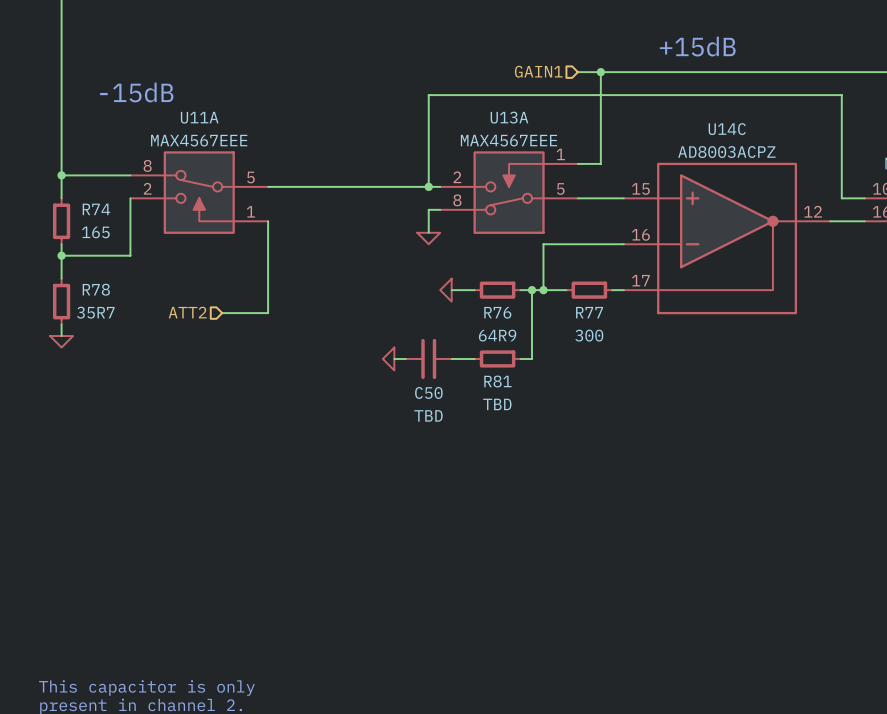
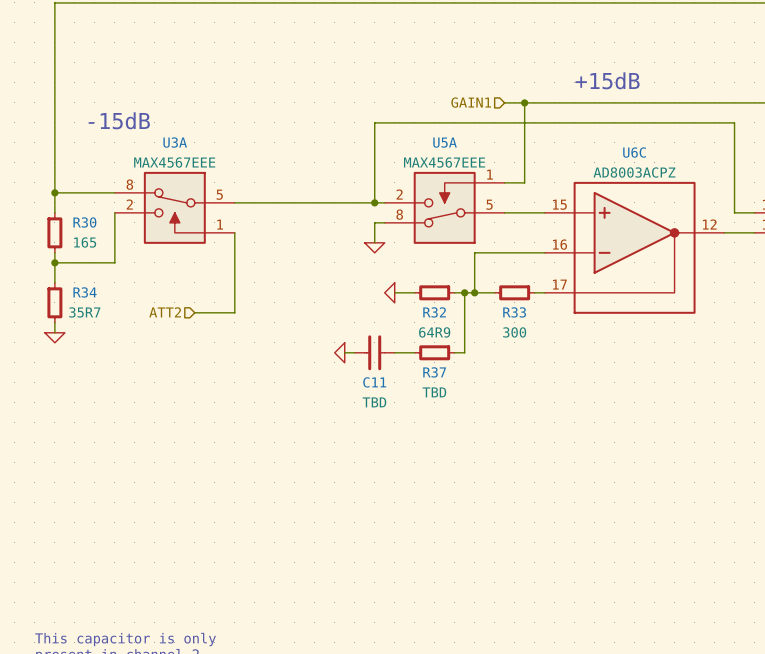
U11A name: U11A (199, 117) -> U3A (175, 142)
U13A name: U13A (509, 117) -> U5A (445, 142)
U14C name: U14C (727, 129) -> U6C (634, 152)
R74 name: R74 (96, 209) -> R30 (84, 222)
R78 name: R78 (96, 289) -> R34 (85, 292)
R76 name: R76 (497, 312) -> R32 (434, 312)
R77 name: R77 (589, 312) -> R33 (514, 312)
R81 name: R81 (497, 381) -> R37 (434, 372)
C50 name: C50 (428, 392) -> C11 (374, 382)

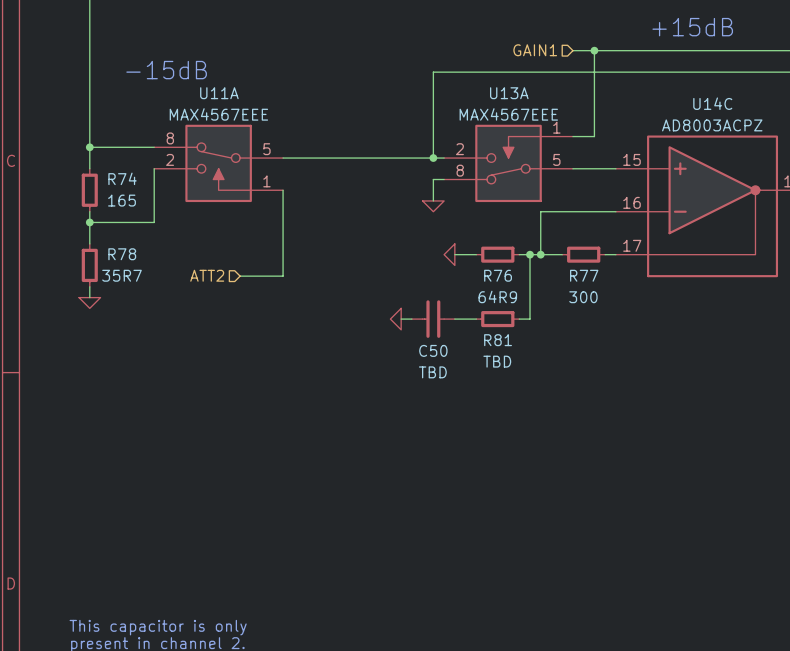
U3A name: U3A (175, 142) -> U11A (219, 93)
U5A name: U5A (445, 142) -> U13A (509, 93)
U6C name: U6C (634, 152) -> U14C (712, 103)
R30 name: R30 (84, 222) -> R74 (122, 178)
R34 name: R34 (85, 292) -> R78 (122, 254)
R32 name: R32 (434, 312) -> R76 (498, 275)
R33 name: R33 (514, 312) -> R77 (584, 275)
R37 name: R37 (434, 372) -> R81 (498, 340)
C11 name: C11 (374, 382) -> C50 (433, 350)

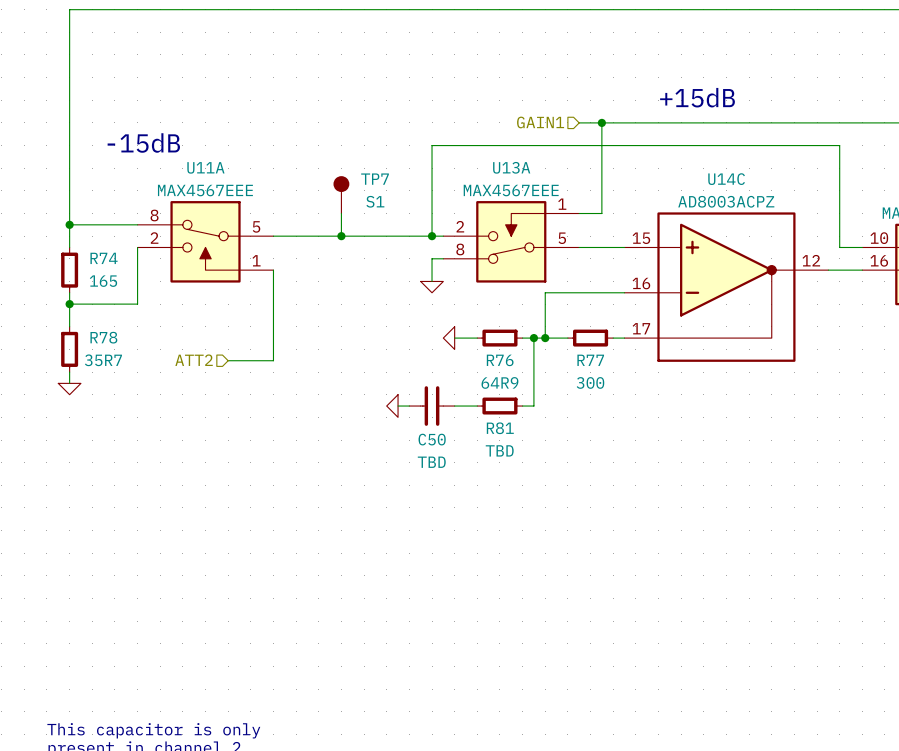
TP7: none -> S1 (341, 194)
wire: none -> (341, 213) (341, 236)
junction: none -> (341, 236)

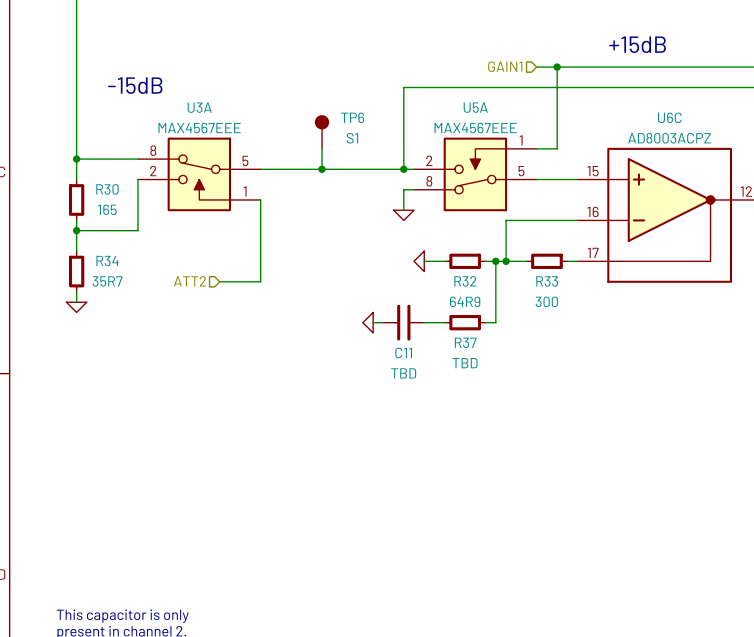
U11A name: U11A (205, 167) -> U3A (199, 107)
U13A name: U13A (511, 167) -> U5A (475, 107)
TP7 name: TP7 (375, 179) -> TP6 (352, 117)
U14C name: U14C (726, 179) -> U6C (669, 117)
R74 name: R74 (104, 258) -> R30 (107, 189)
R78 name: R78 (103, 337) -> R34 (107, 261)
R76 name: R76 (500, 360) -> R32 (465, 281)
R77 name: R77 (590, 360) -> R33 (547, 281)
R81 name: R81 (500, 428) -> R37 (465, 342)
C50 name: C50 (432, 439) -> C11 (403, 352)

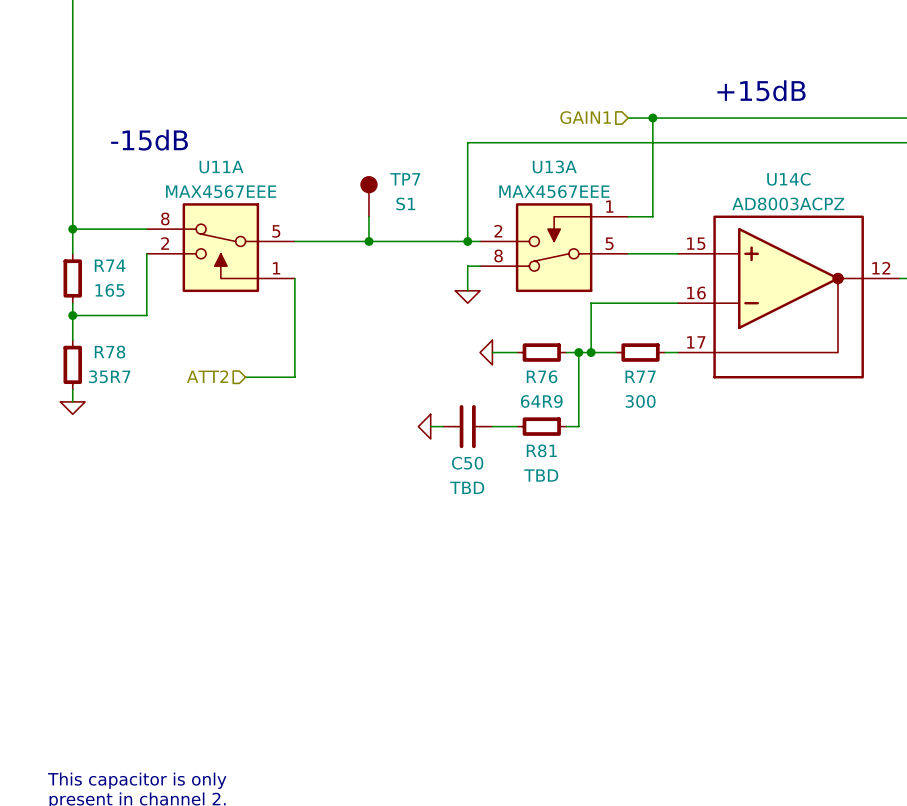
U3A name: U3A (199, 107) -> U11A (221, 167)
U5A name: U5A (475, 107) -> U13A (554, 166)
TP6 name: TP6 (352, 117) -> TP7 (405, 179)
U6C name: U6C (669, 117) -> U14C (788, 179)
R30 name: R30 (107, 189) -> R74 (110, 265)
R34 name: R34 (107, 261) -> R78 (110, 352)
R32 name: R32 (465, 281) -> R76 (542, 376)
R33 name: R33 (547, 281) -> R77 (640, 376)
R37 name: R37 (465, 342) -> R81 (541, 450)
C11 name: C11 (403, 352) -> C50 (467, 463)

